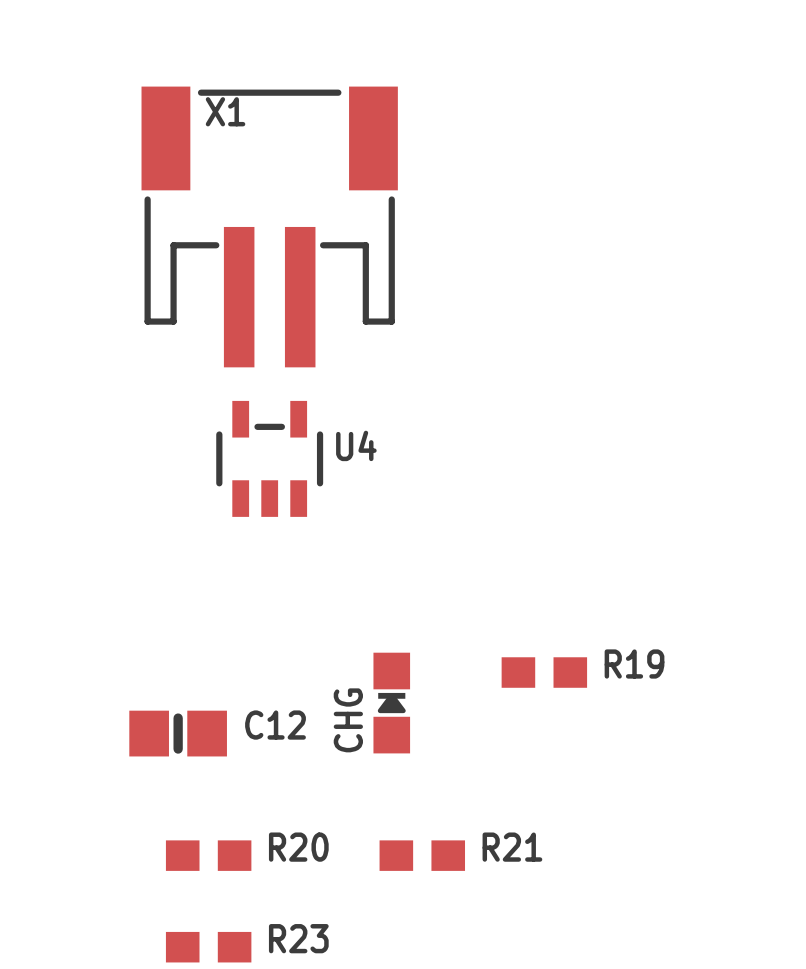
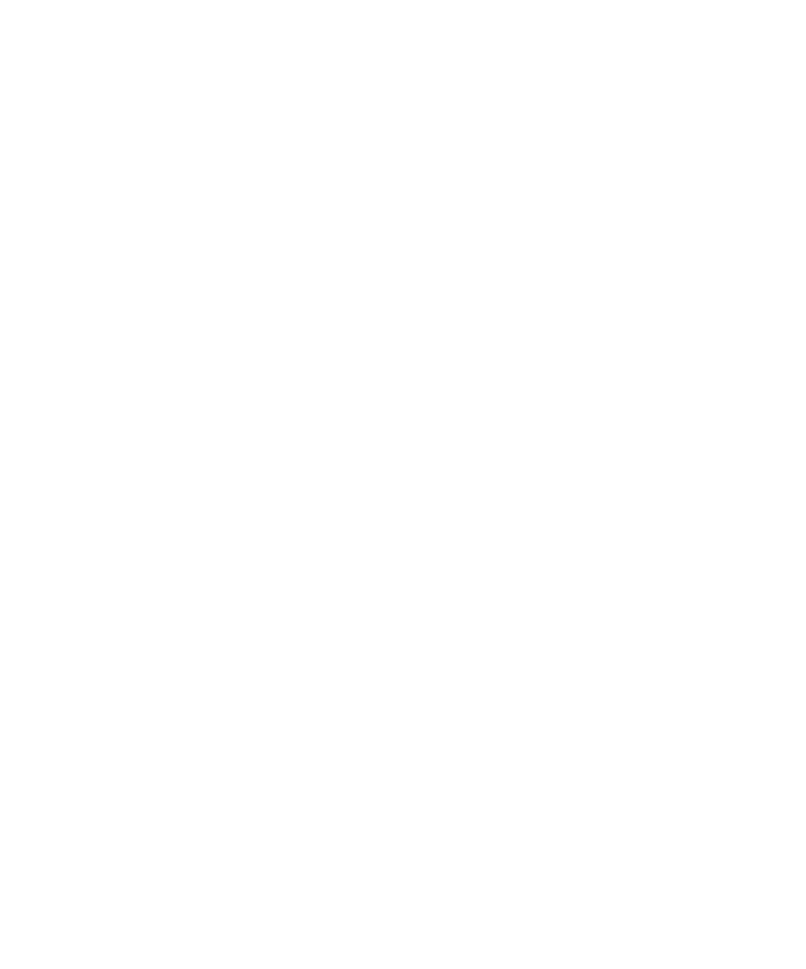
X1: (269, 226) -> none
U4: (269, 458) -> none
R19: (544, 672) -> none
CHG: (391, 703) -> none
C12: (178, 733) -> none
R20: (208, 855) -> none
R21: (422, 855) -> none
R23: (208, 947) -> none

